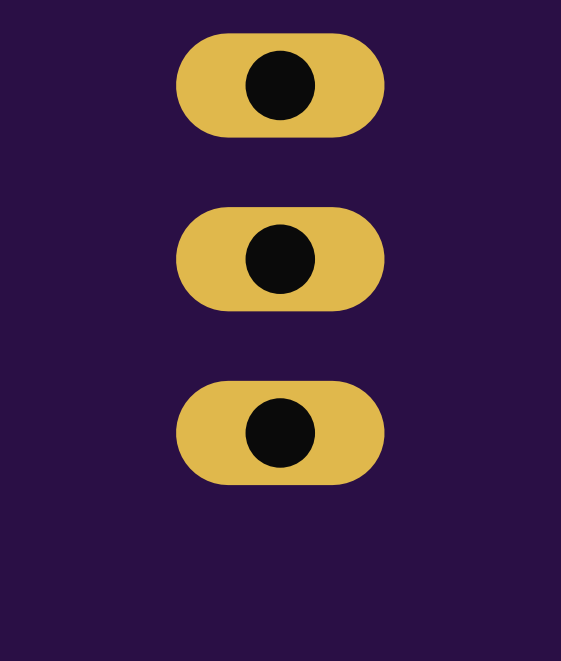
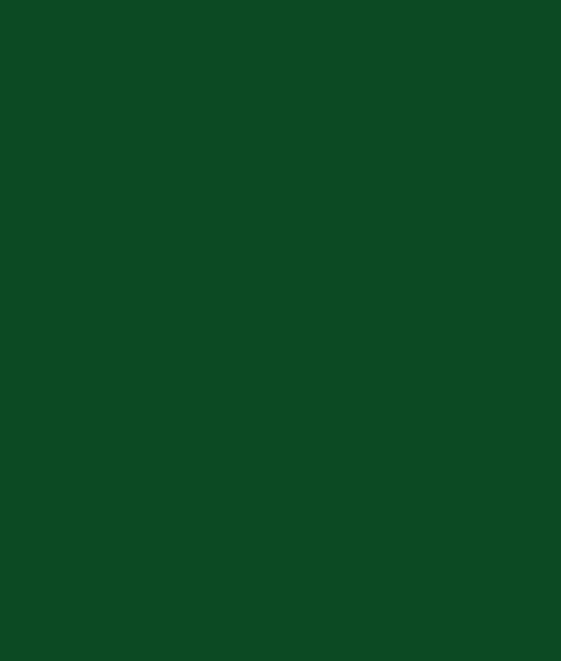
part: (280, 259) -> none

